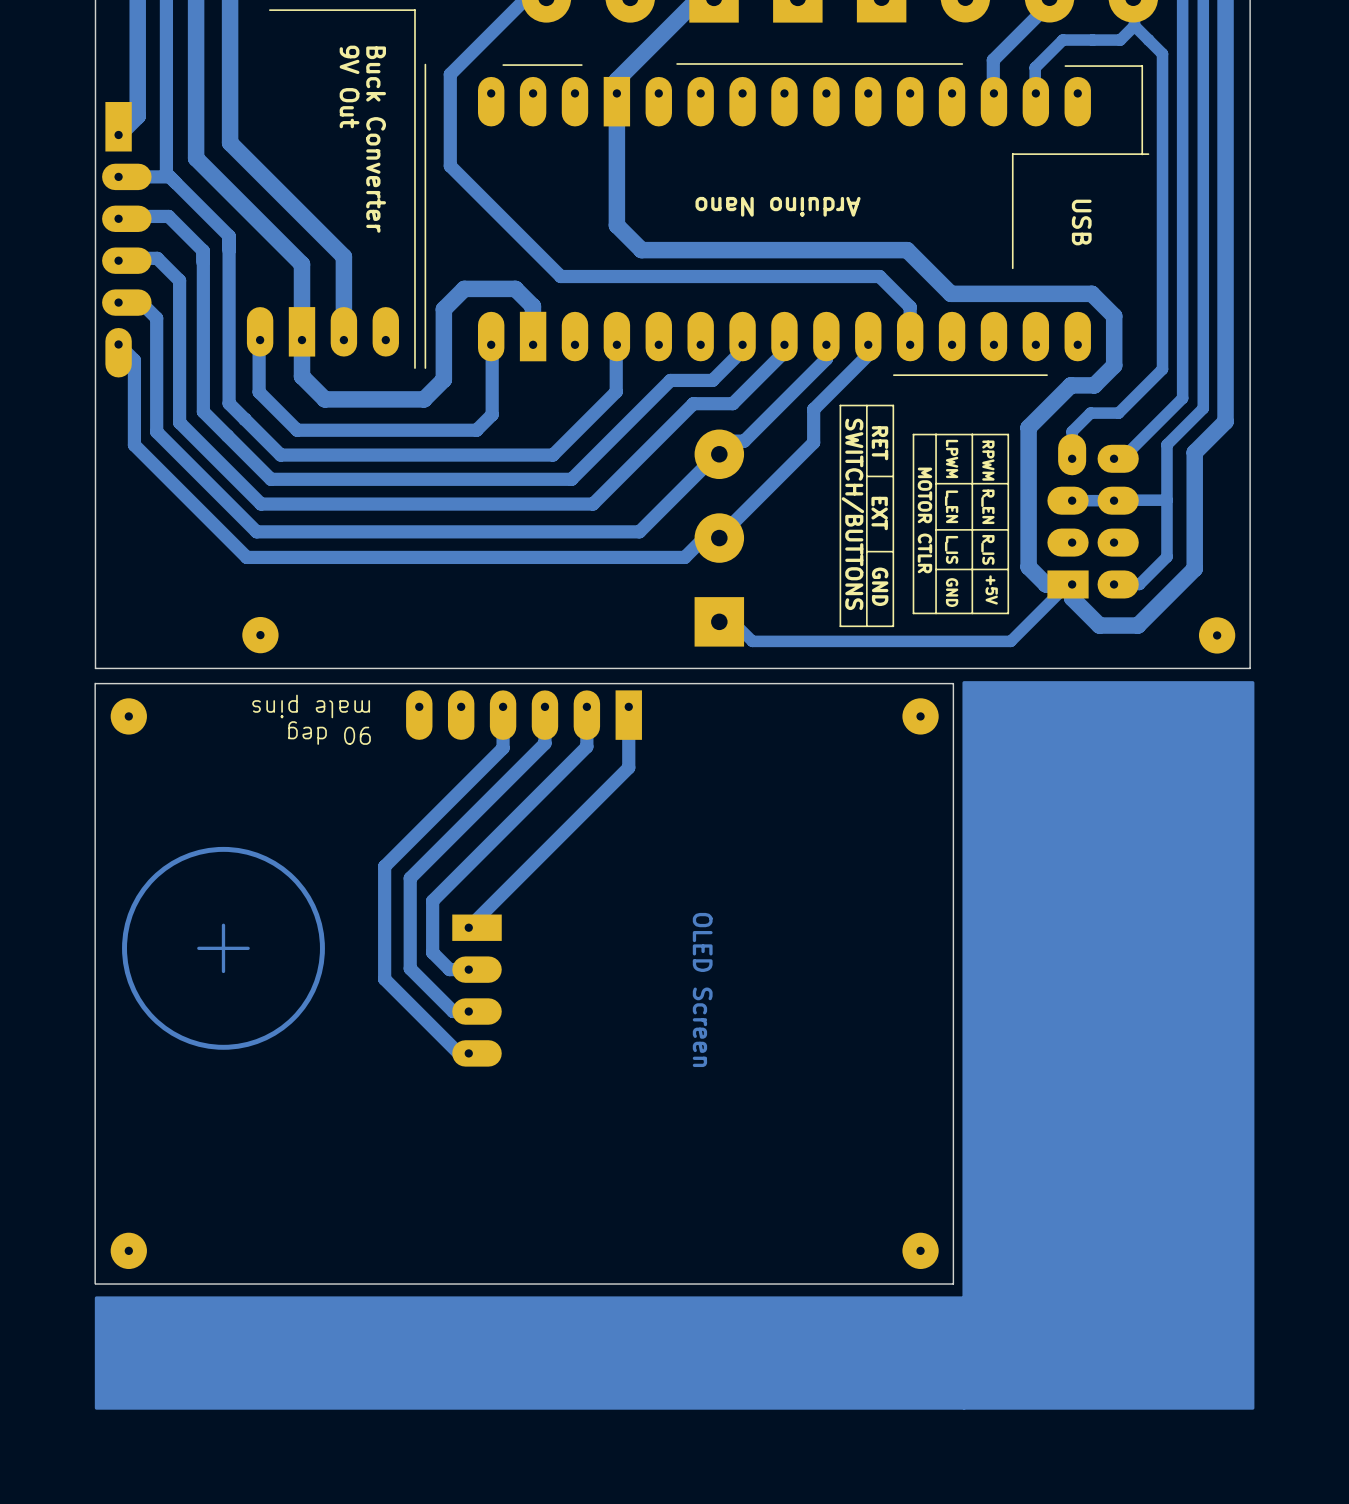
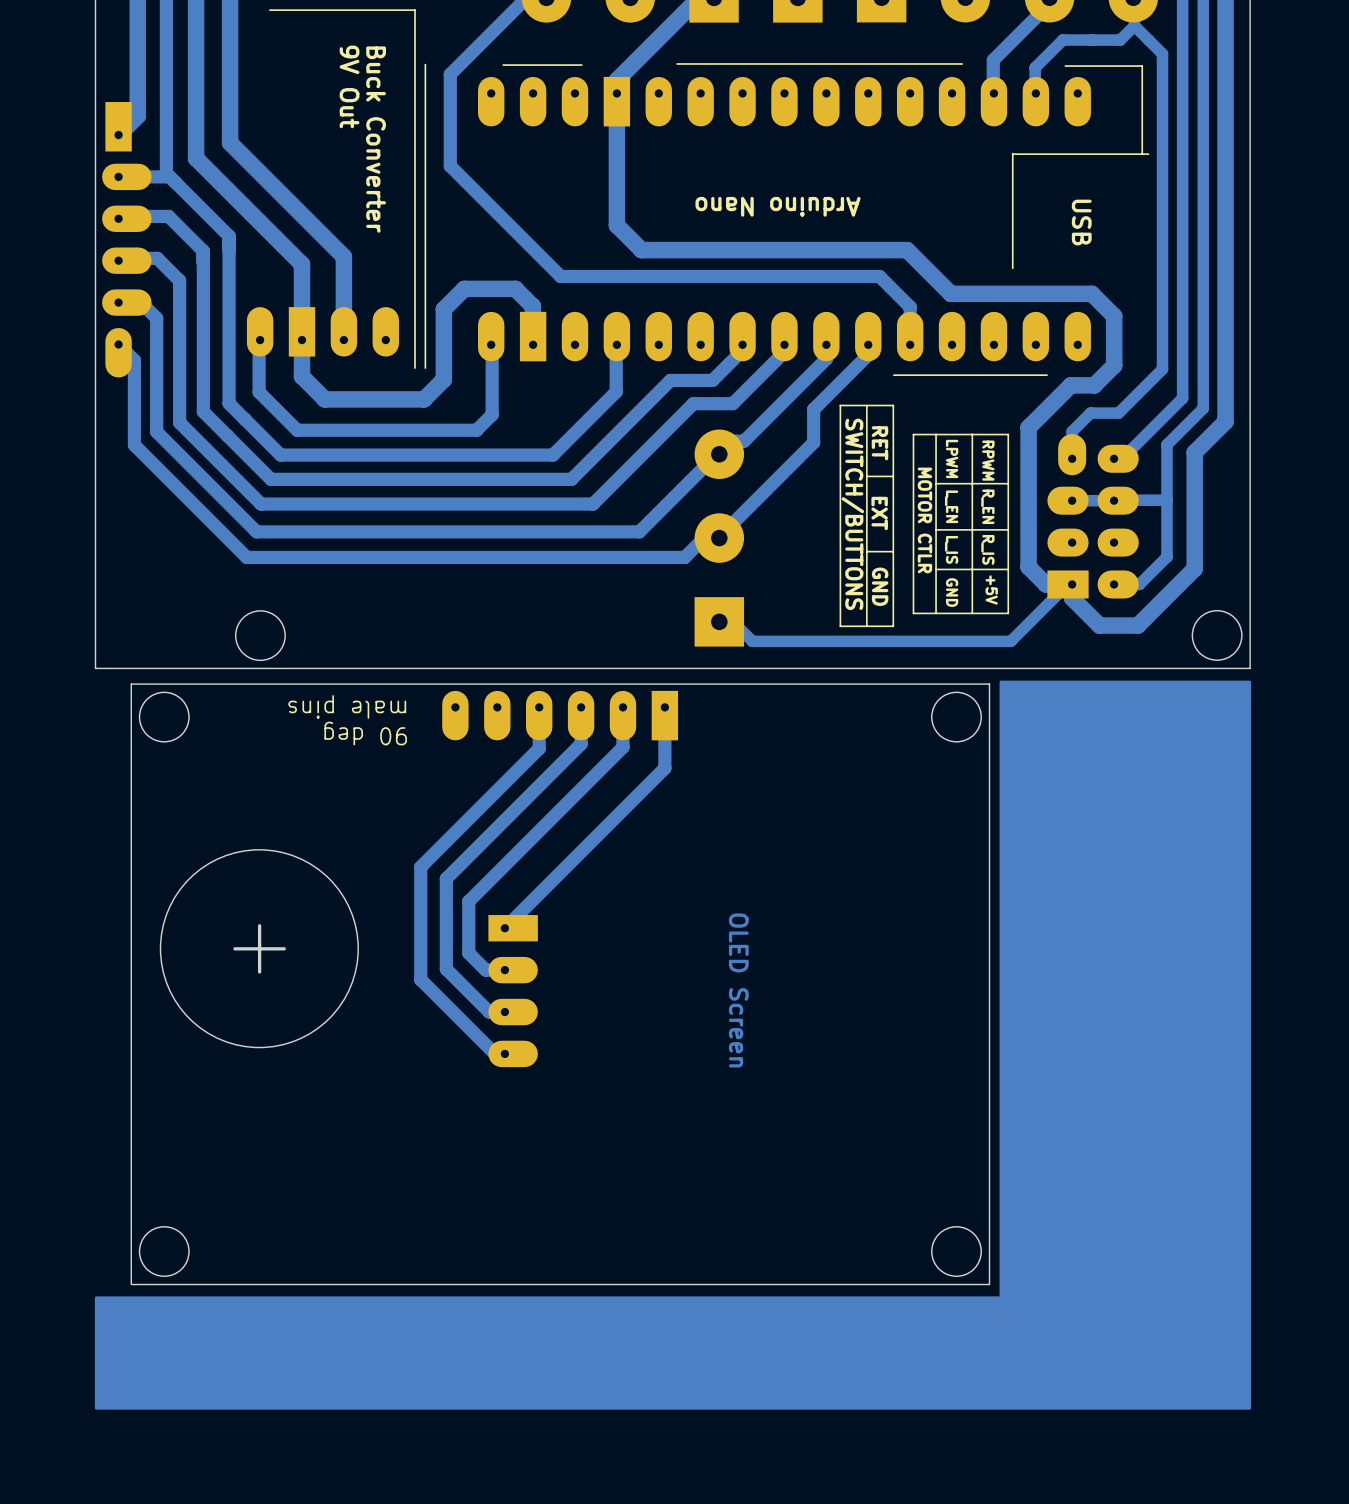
round board edge: none -> [235, 610, 286, 661]
round board edge: none -> [1191, 610, 1243, 661]
part: (260, 635) -> none
part: (1217, 635) -> none
drawing: none -> [94, 680, 1252, 1410]
drawing: [94, 681, 1255, 1410] -> none
board edge: (95, 683) (953, 683) (953, 1284) (95, 1284) -> (131, 684) (989, 684) (989, 1284) (131, 1284)
board edge: (95, 683) (95, 1283) -> (131, 683) (131, 1284)
round board edge: none -> [139, 691, 190, 743]
round board edge: none -> [931, 691, 982, 743]
text position: male pins (311, 706) -> male pins (347, 706)
track: (503, 706) (503, 748) (384, 866) (384, 979) (458, 1053) (468, 1053) -> (539, 707) (539, 748) (420, 867) (420, 979) (494, 1053) (504, 1053)
track: (544, 706) (544, 743) (410, 878) (410, 968) (453, 1011) (468, 1011) -> (581, 707) (581, 743) (446, 878) (446, 969) (489, 1012) (504, 1012)
track: (586, 706) (586, 746) (432, 901) (432, 952) (449, 969) (468, 969) -> (622, 707) (622, 747) (468, 901) (468, 953) (485, 970) (504, 970)
track: (628, 706) (628, 767) (468, 927) -> (664, 707) (664, 768) (504, 928)
part position: (524, 715) -> (560, 715)
part: (128, 716) -> none
part: (920, 716) -> none
text position: 90 deg (329, 733) -> 90 deg (365, 733)
drawing: [122, 846, 325, 1050] -> none
round board edge: none -> [160, 849, 359, 1048]
track: (223, 925) (223, 971) -> none
board edge: none -> (259, 925) (259, 971)
track: (248, 948) (198, 948) -> none
board edge: none -> (284, 948) (234, 948)
text position: OLED Screen (702, 989) -> OLED Screen (738, 990)
part position: (477, 990) -> (513, 991)
round board edge: none -> [139, 1226, 190, 1277]
round board edge: none -> [931, 1226, 982, 1277]
part: (128, 1250) -> none
part: (920, 1250) -> none

